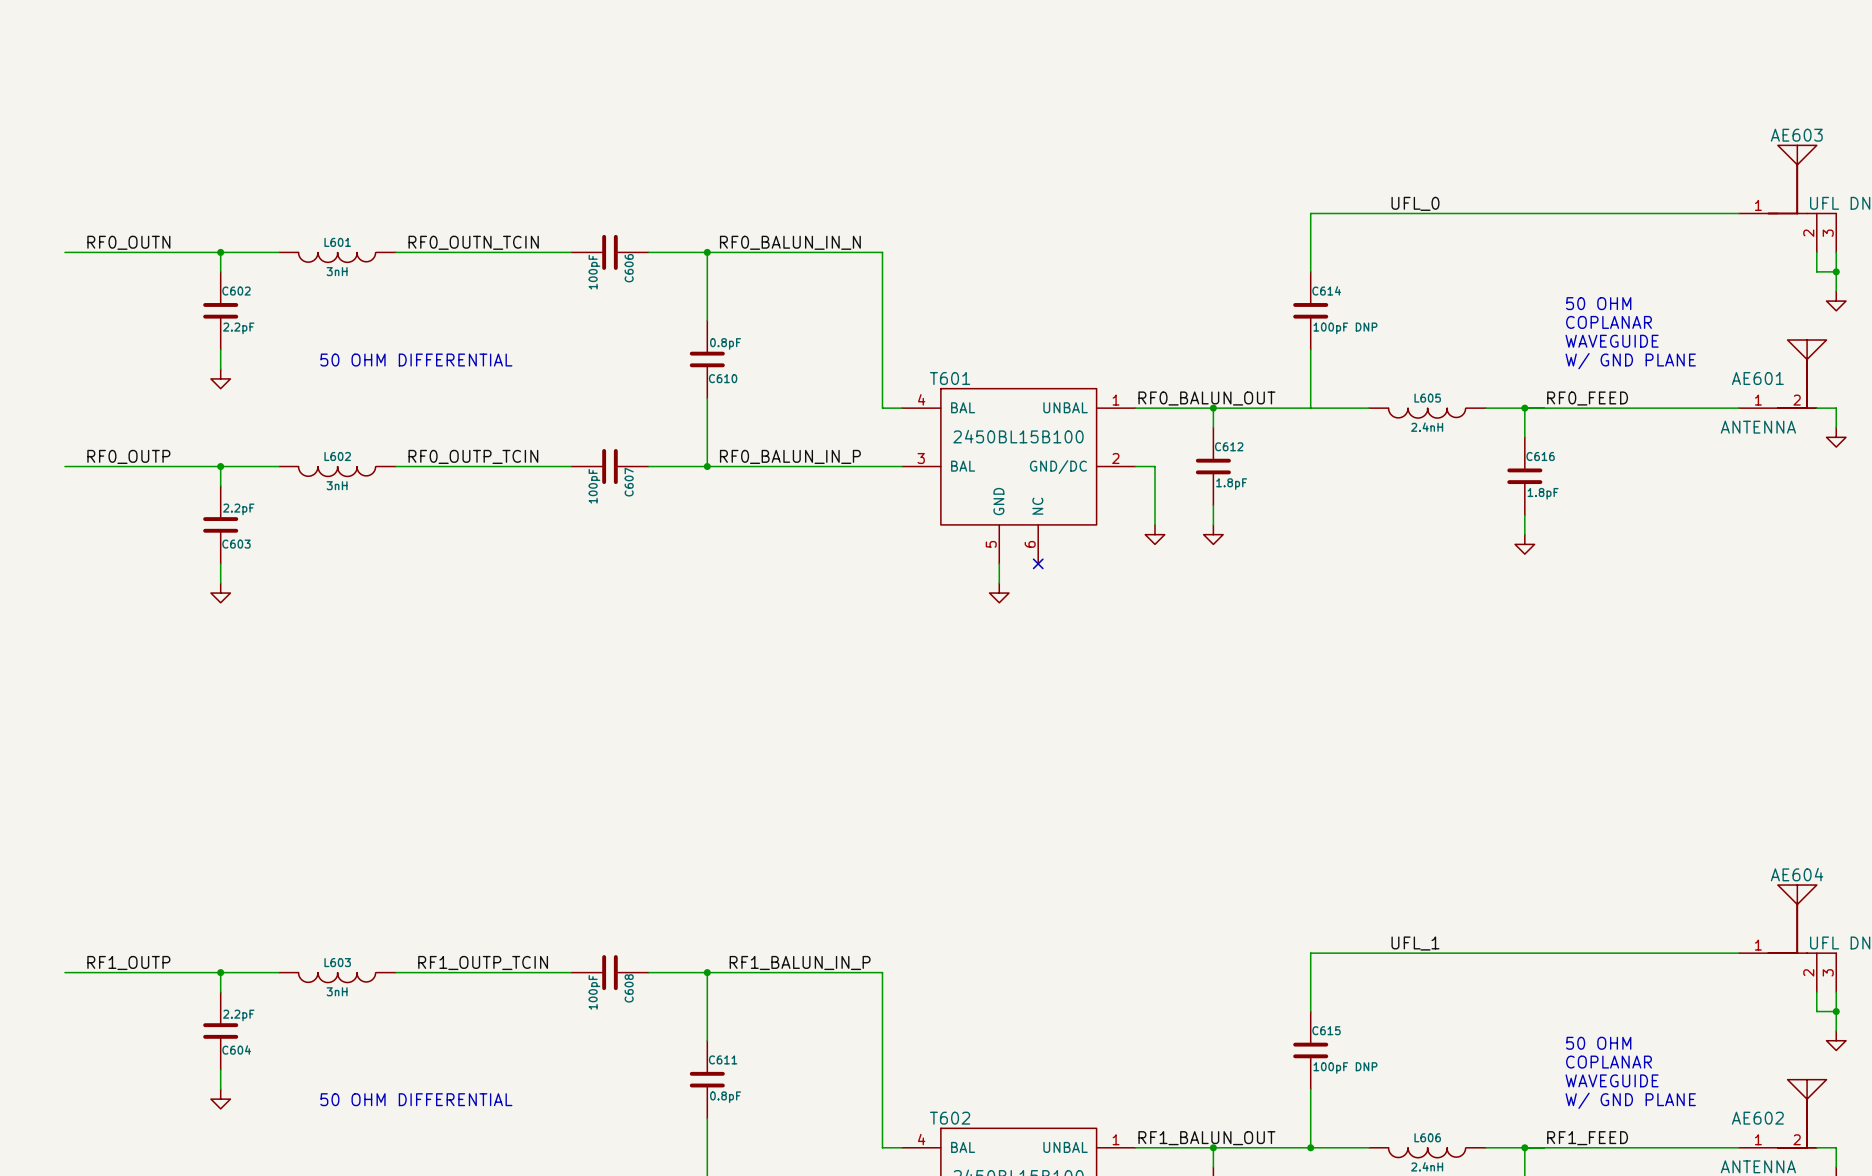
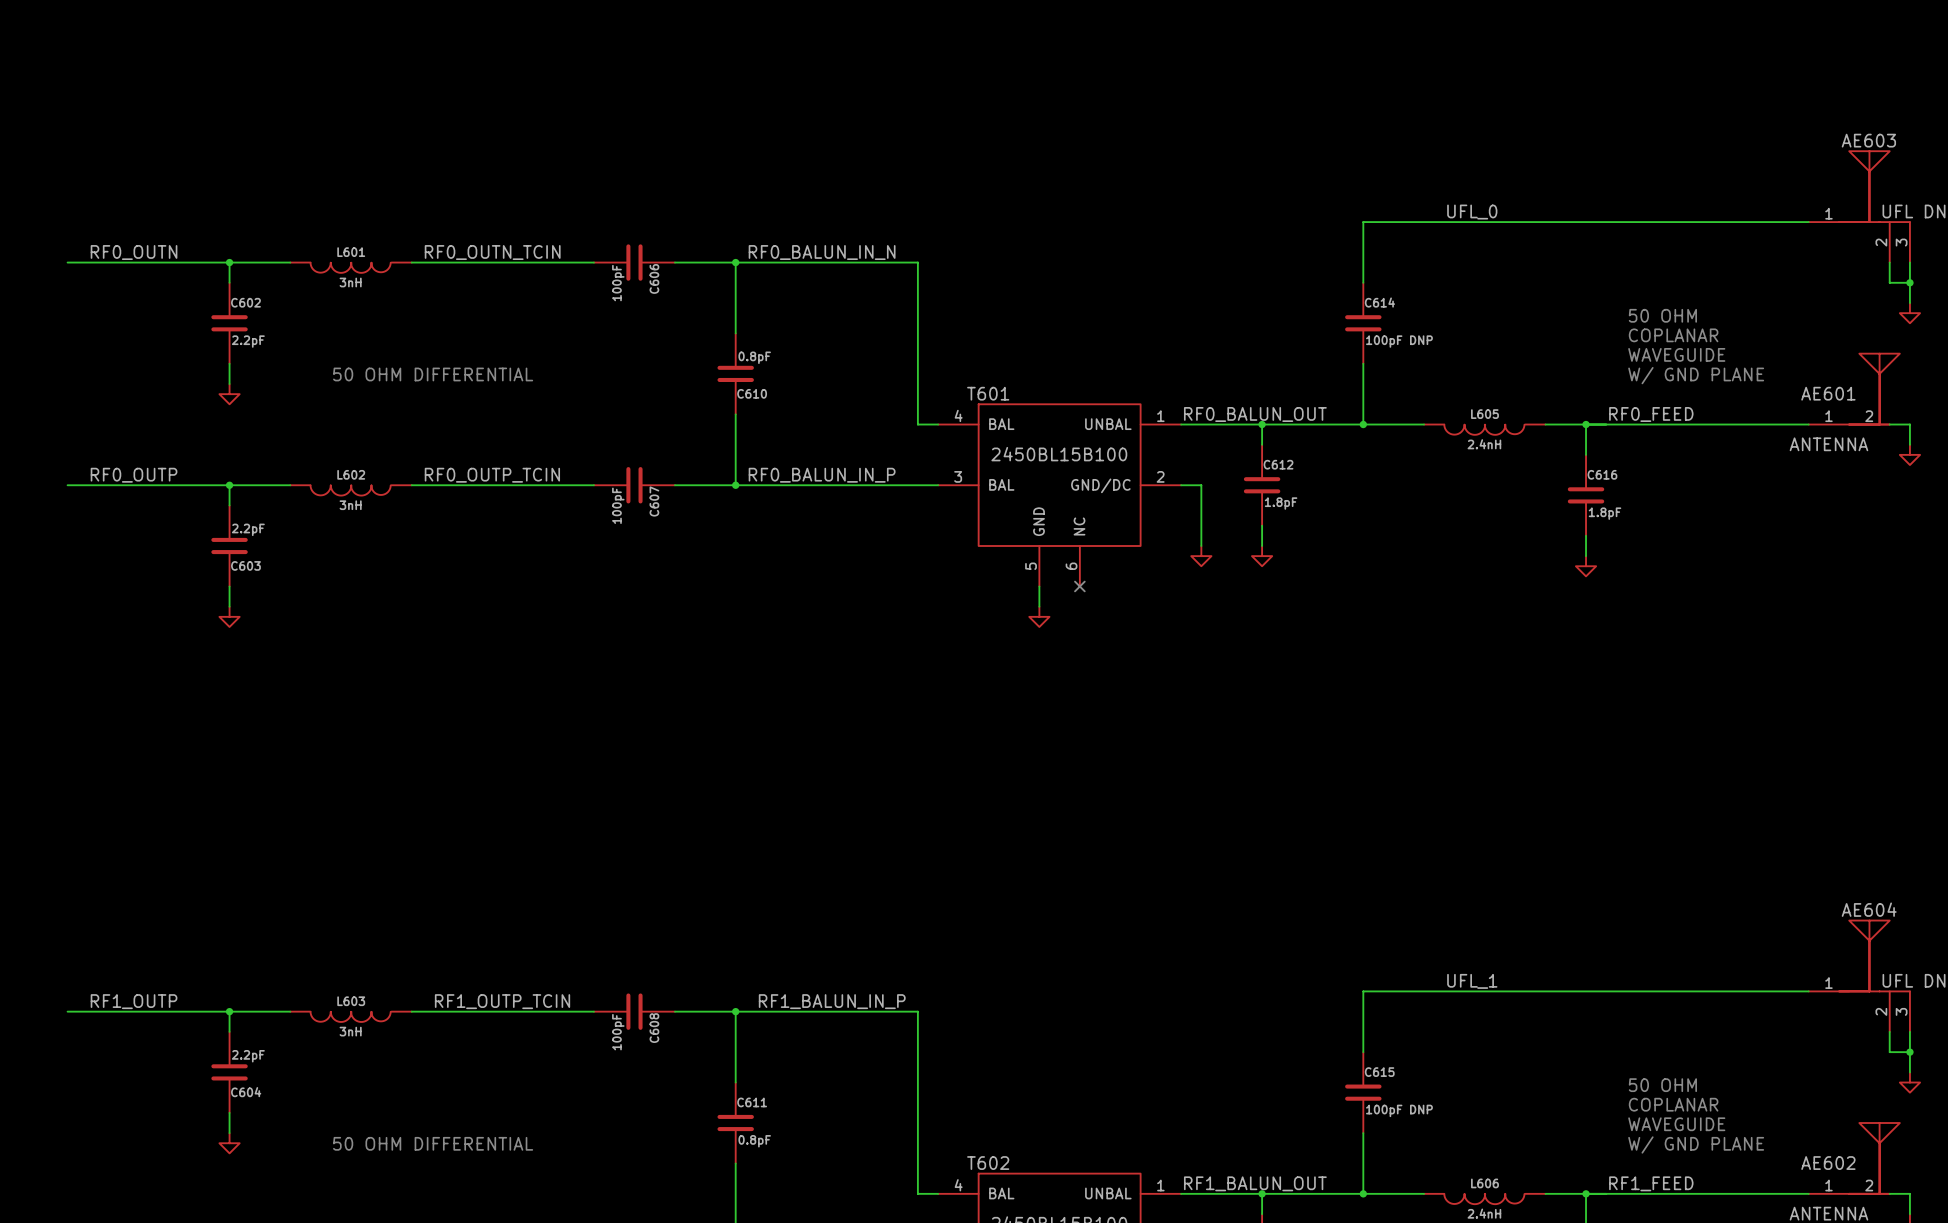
junction: none -> (1363, 424)

